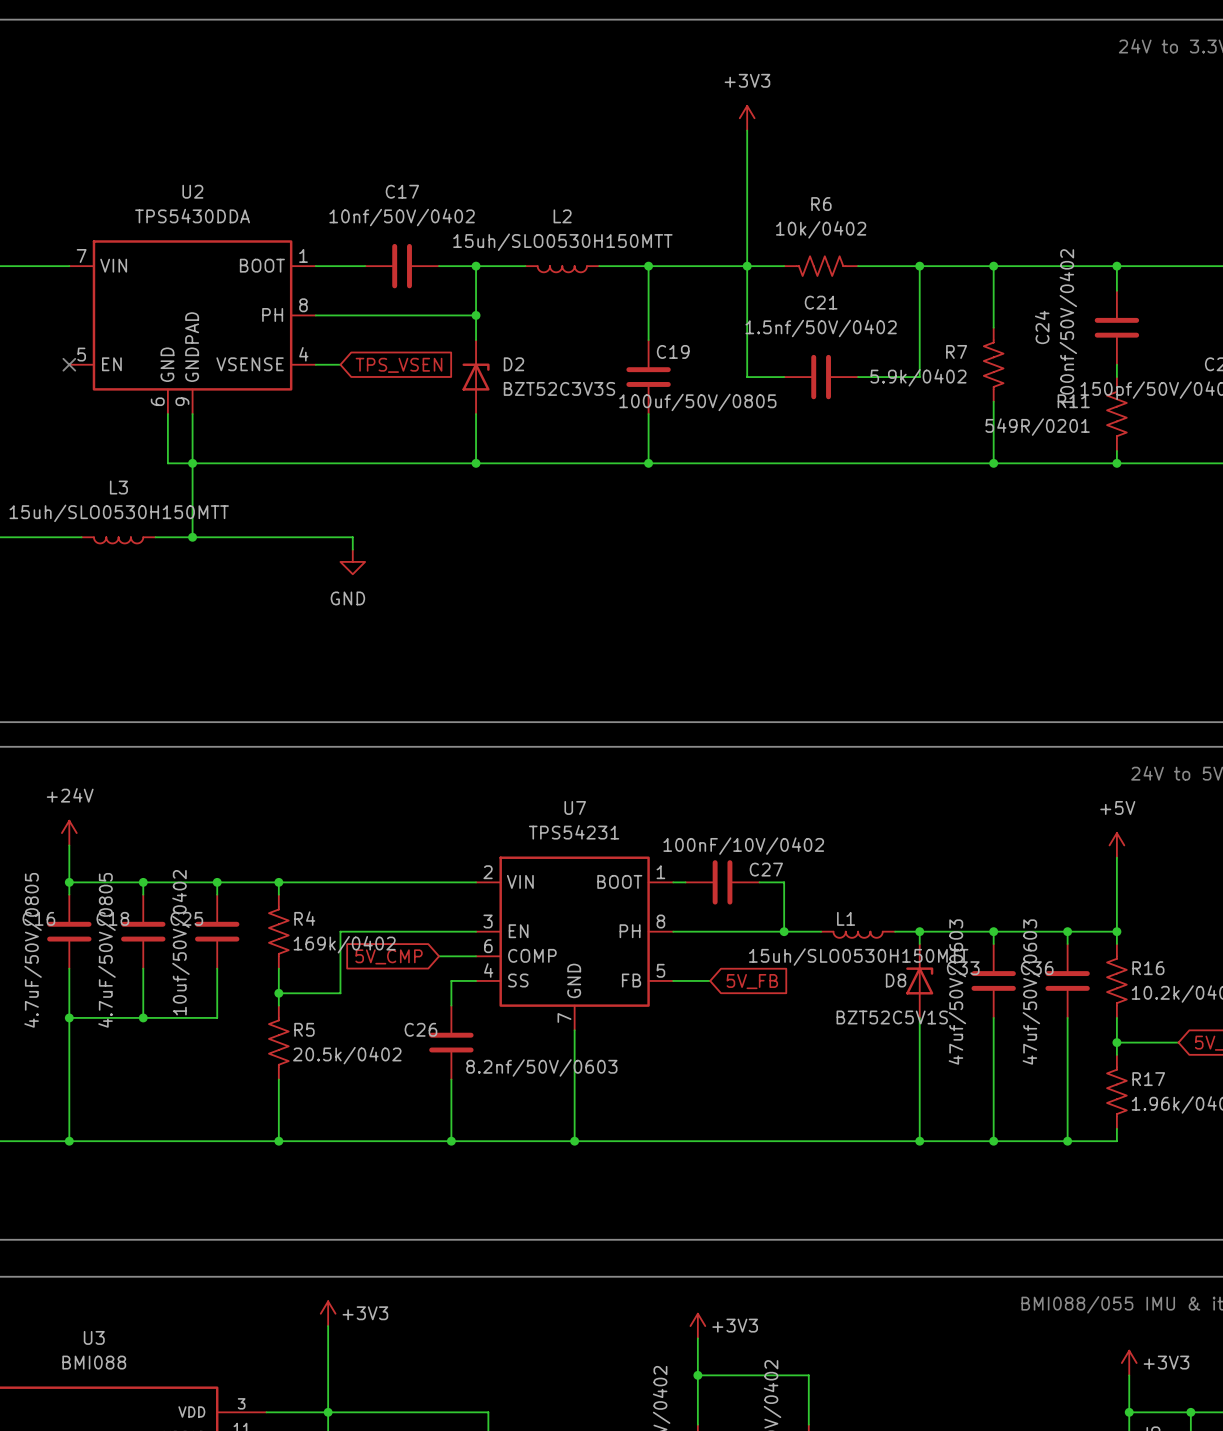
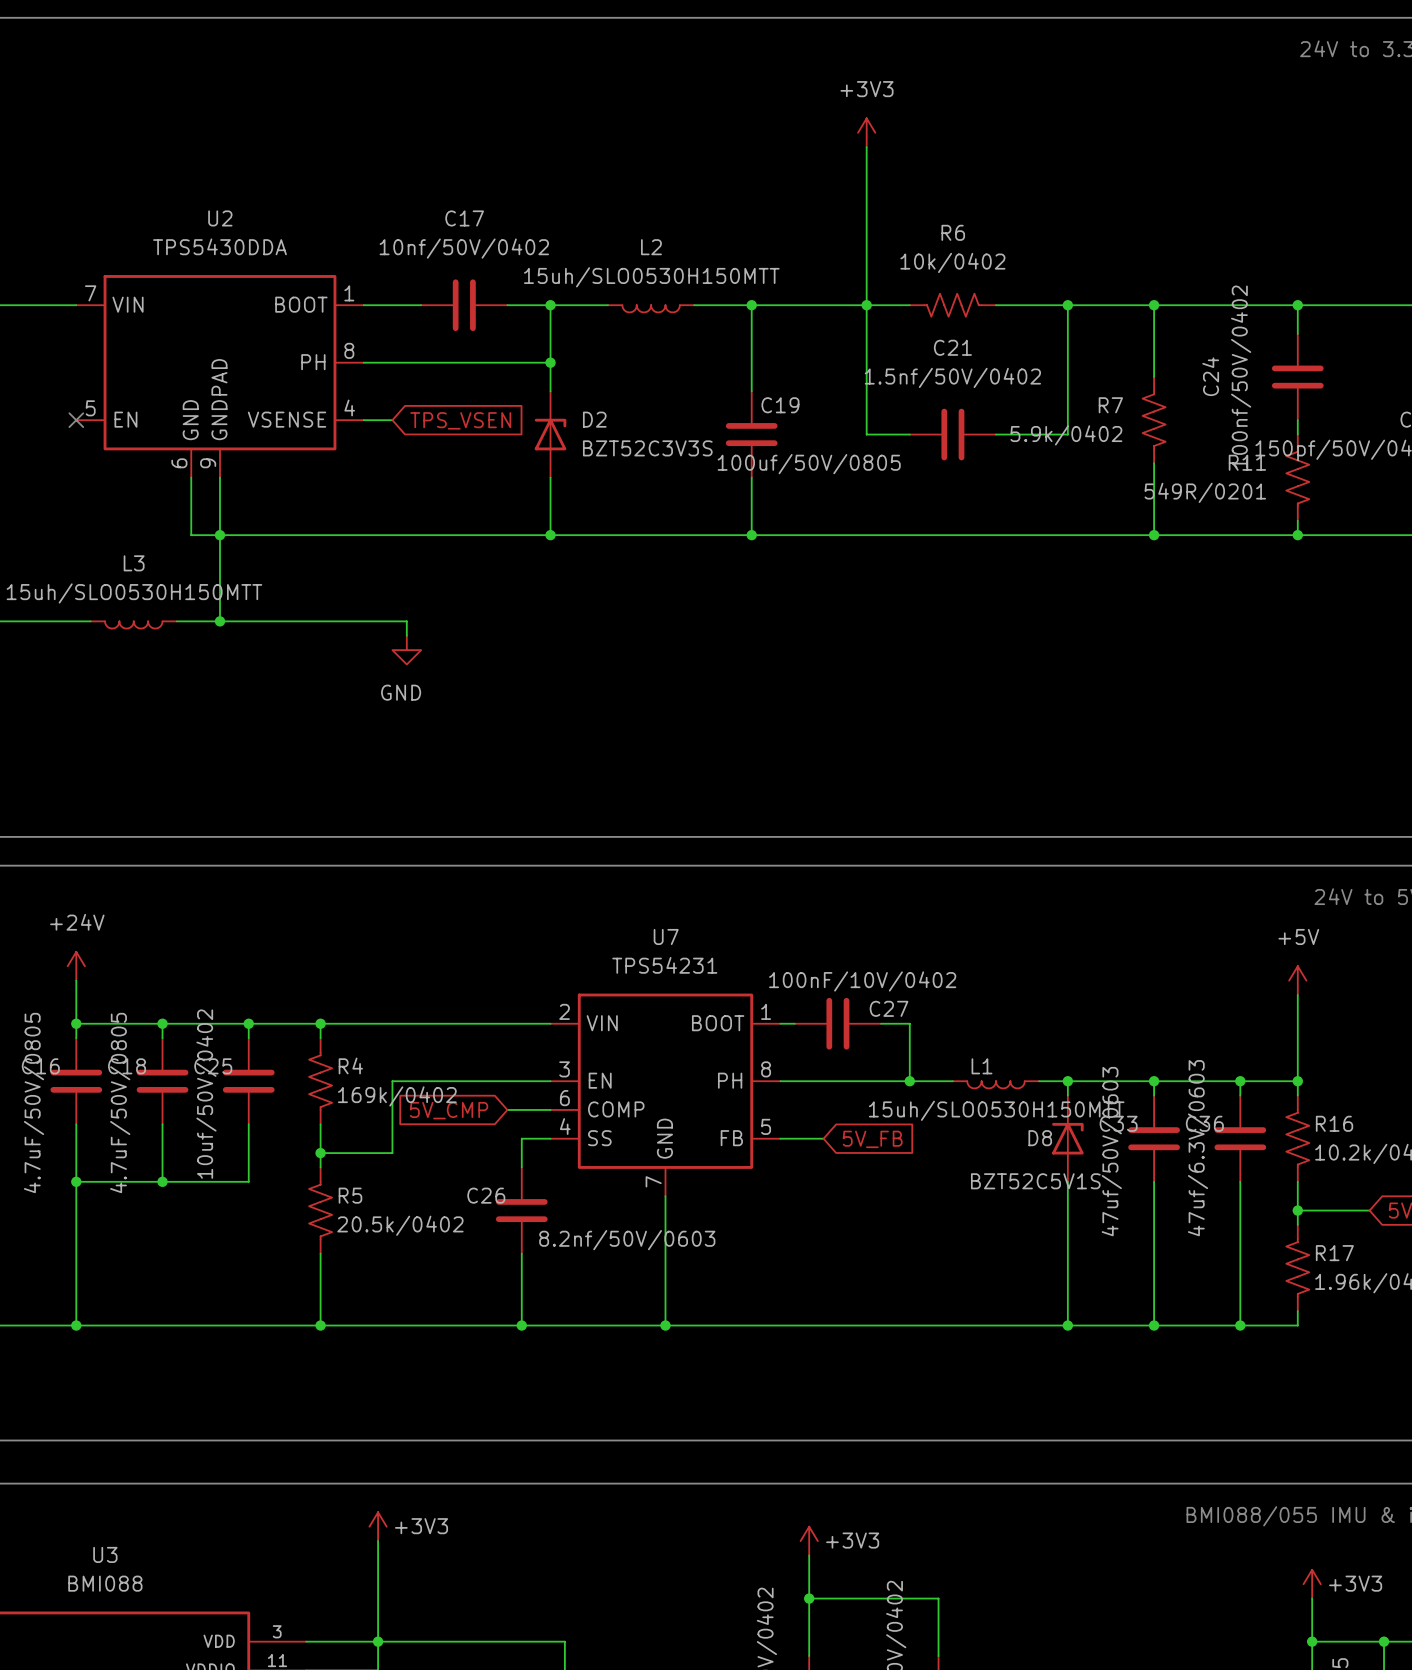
C36 value: 47uf/50V/0603 (1031, 992) -> 47uf/6.3V/0603 (1198, 1148)

